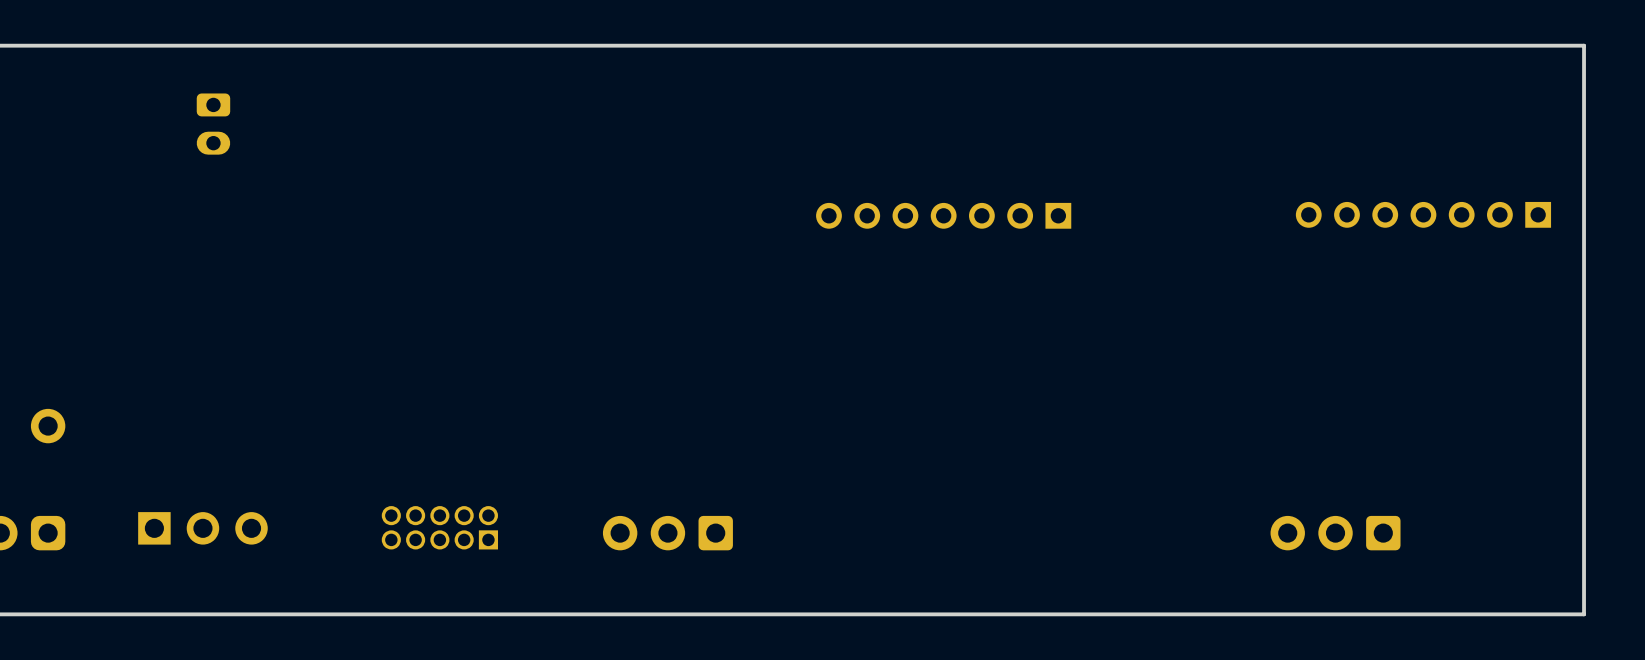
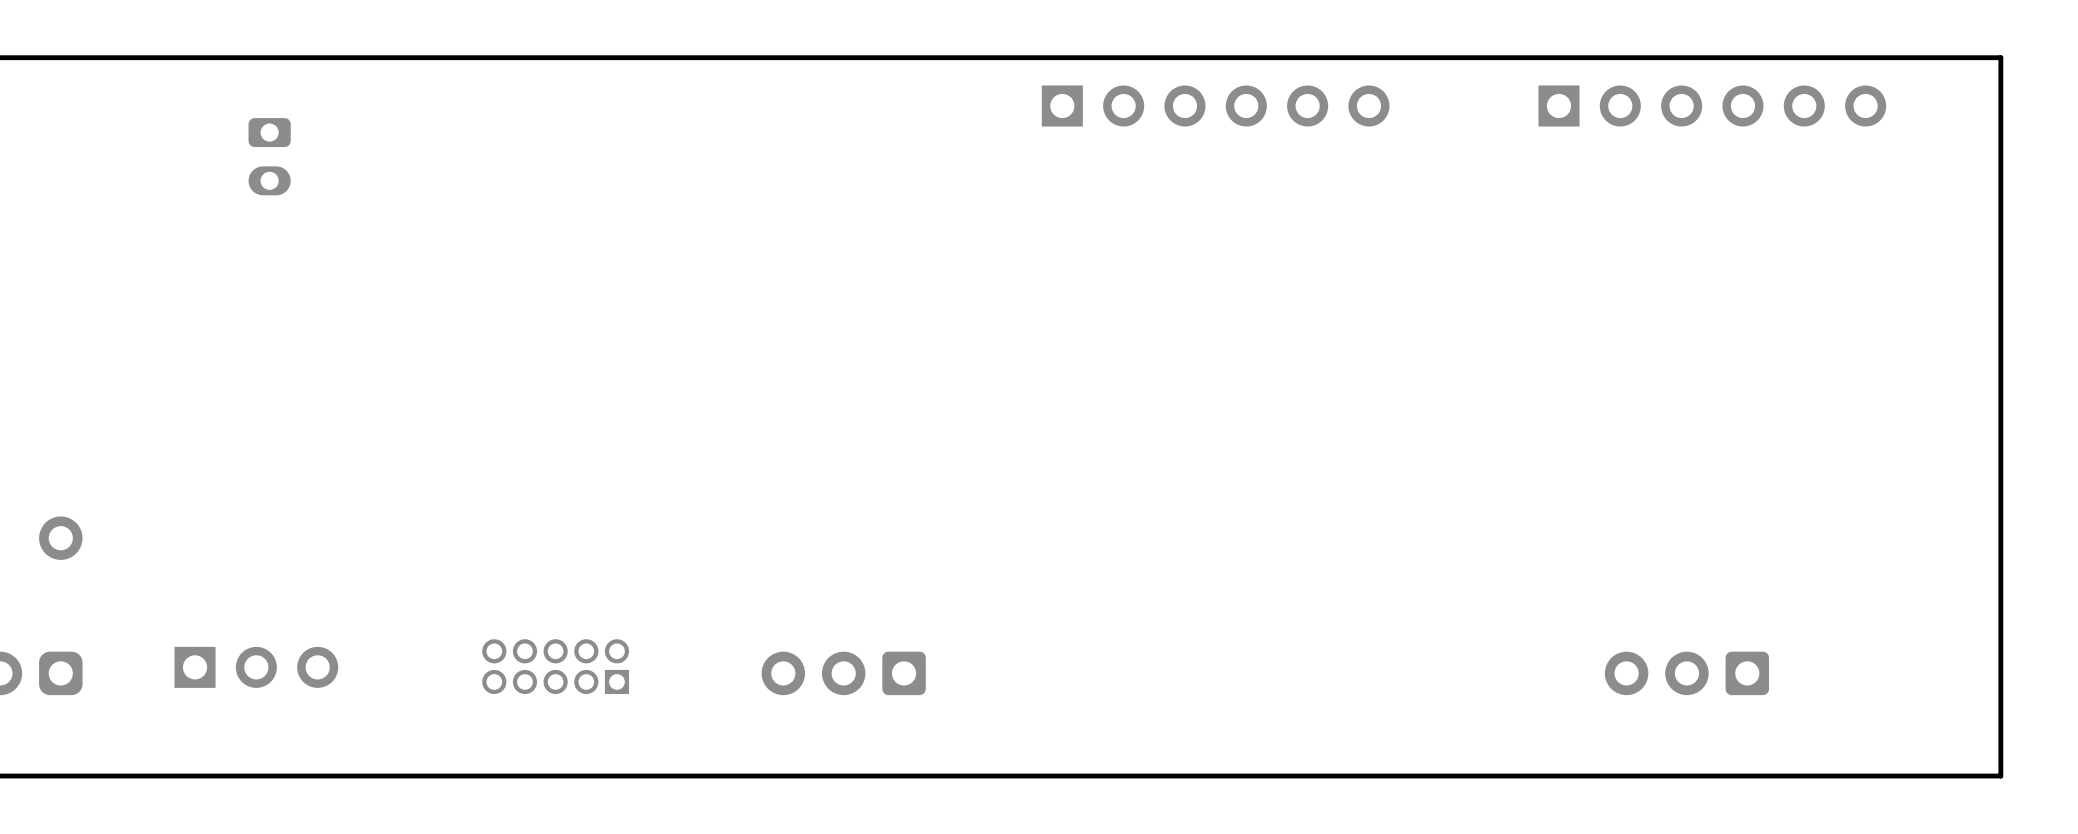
part: none -> (1215, 105)
part: none -> (1712, 105)
part: (1423, 214) -> none
part: (943, 215) -> none

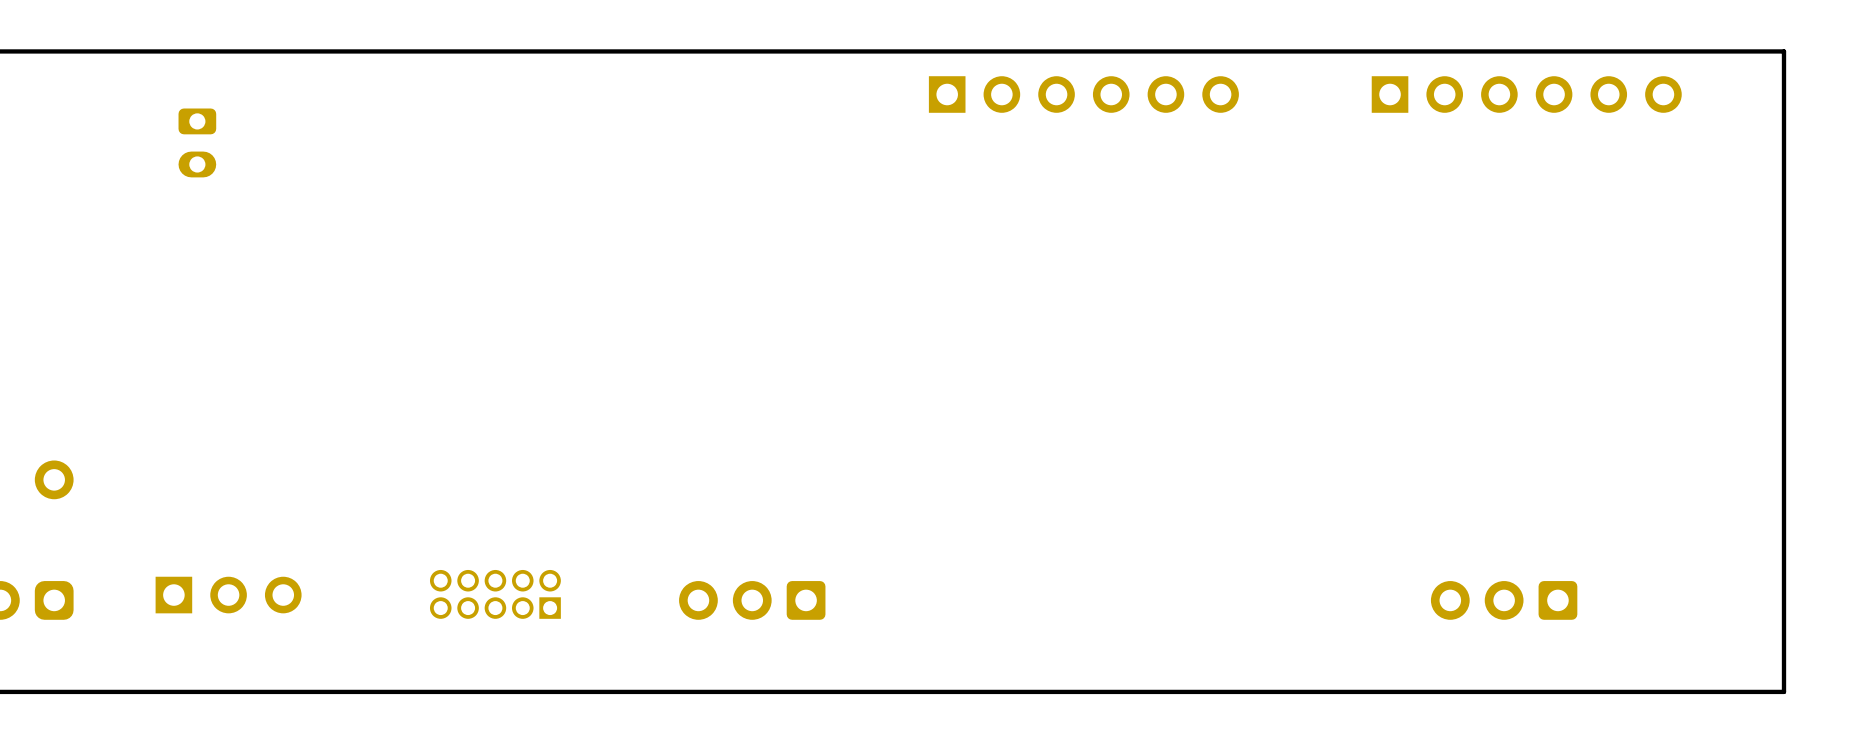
part position: (269, 156) -> (197, 142)

